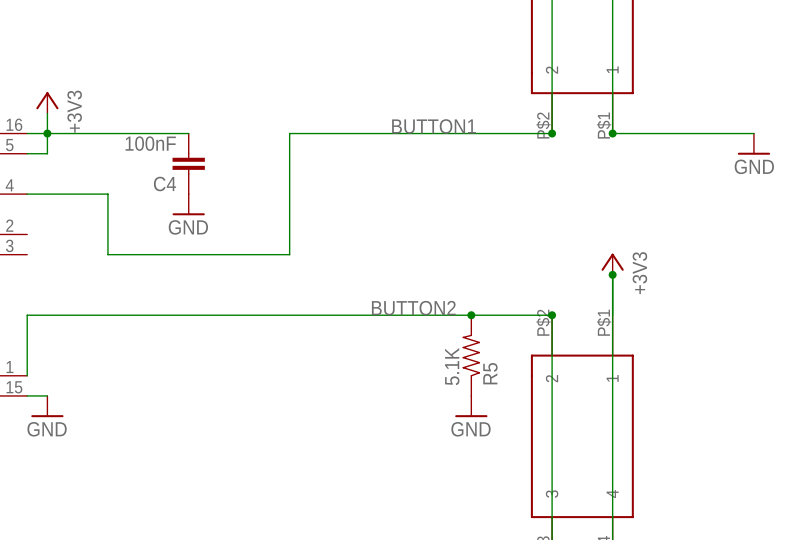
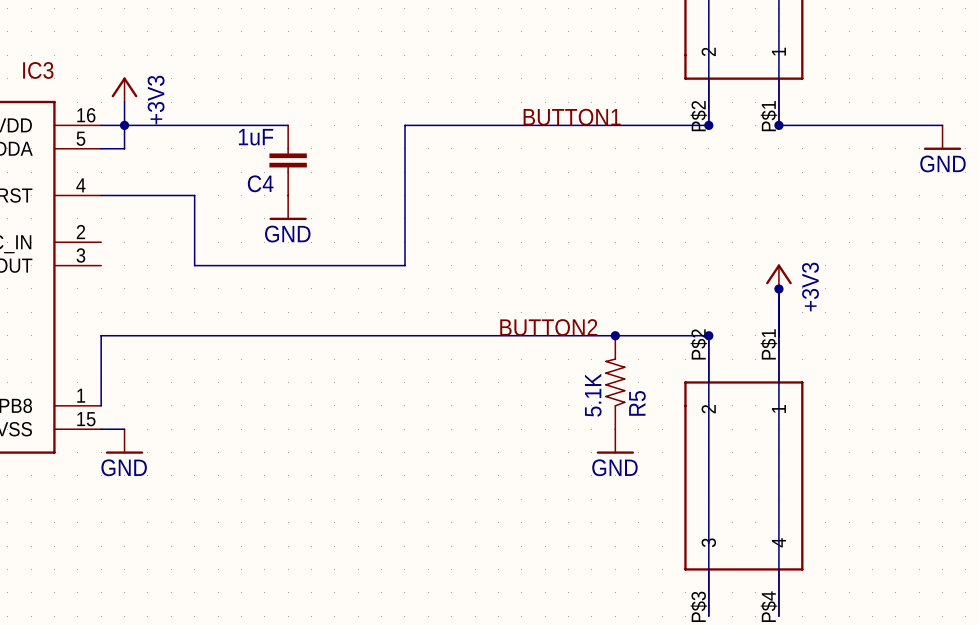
C4 value: 100nF (150, 143) -> 1uF (256, 137)

